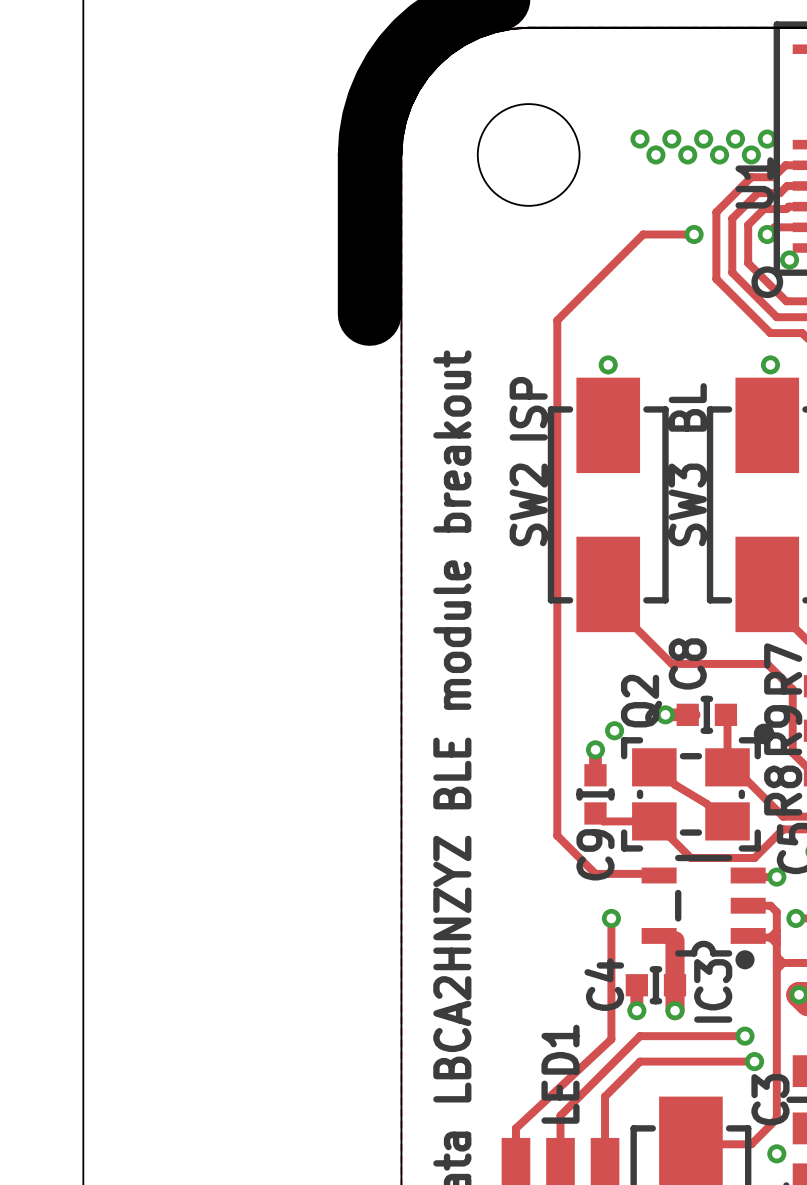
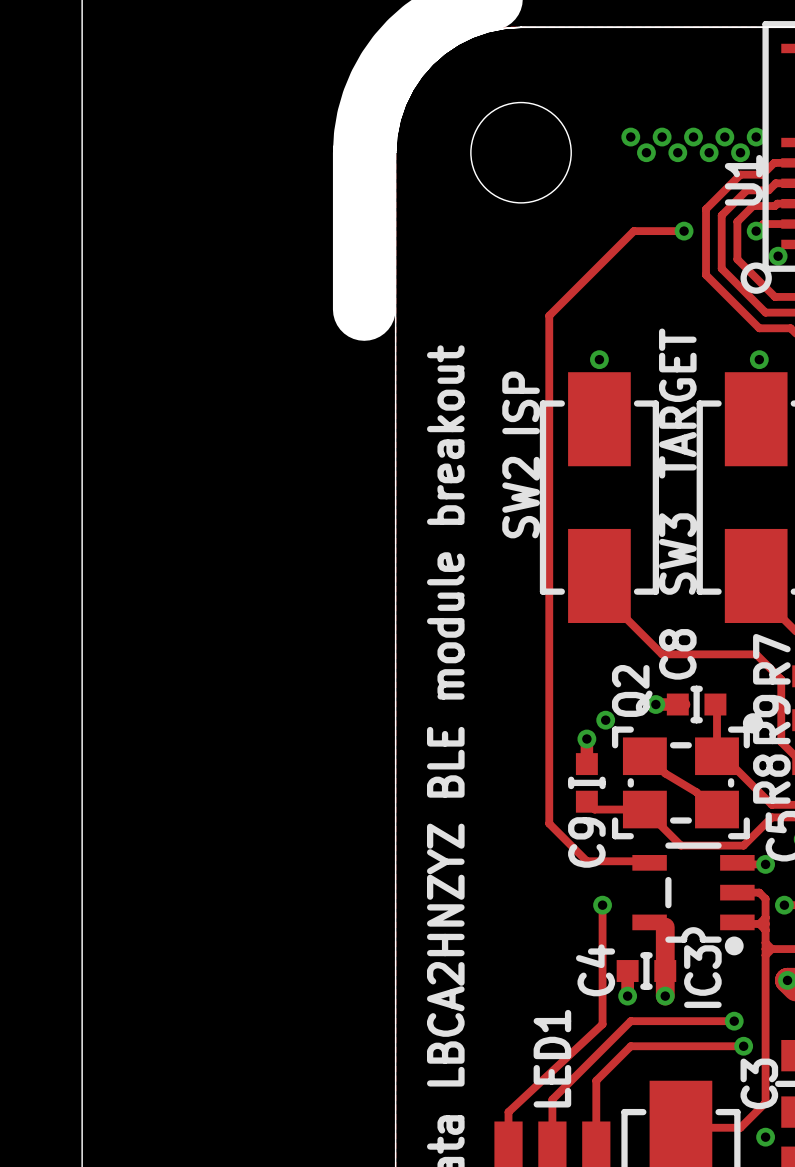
text: BL (687, 407) -> TARGET (677, 403)
SW3 name position: SW3 (687, 504) -> SW3 (677, 554)

